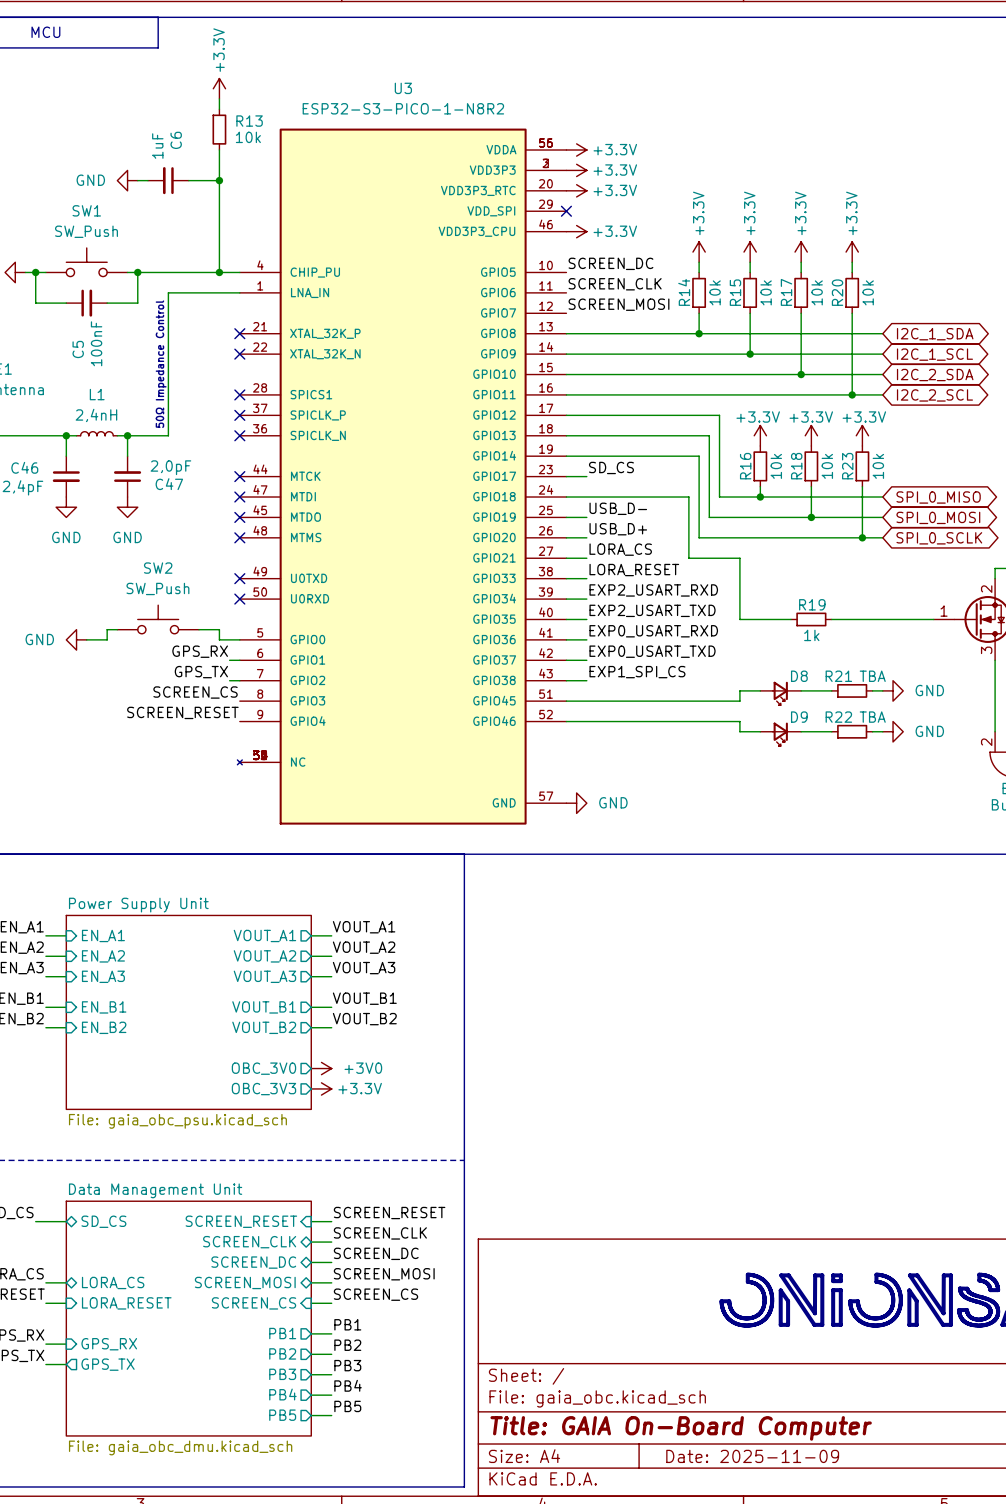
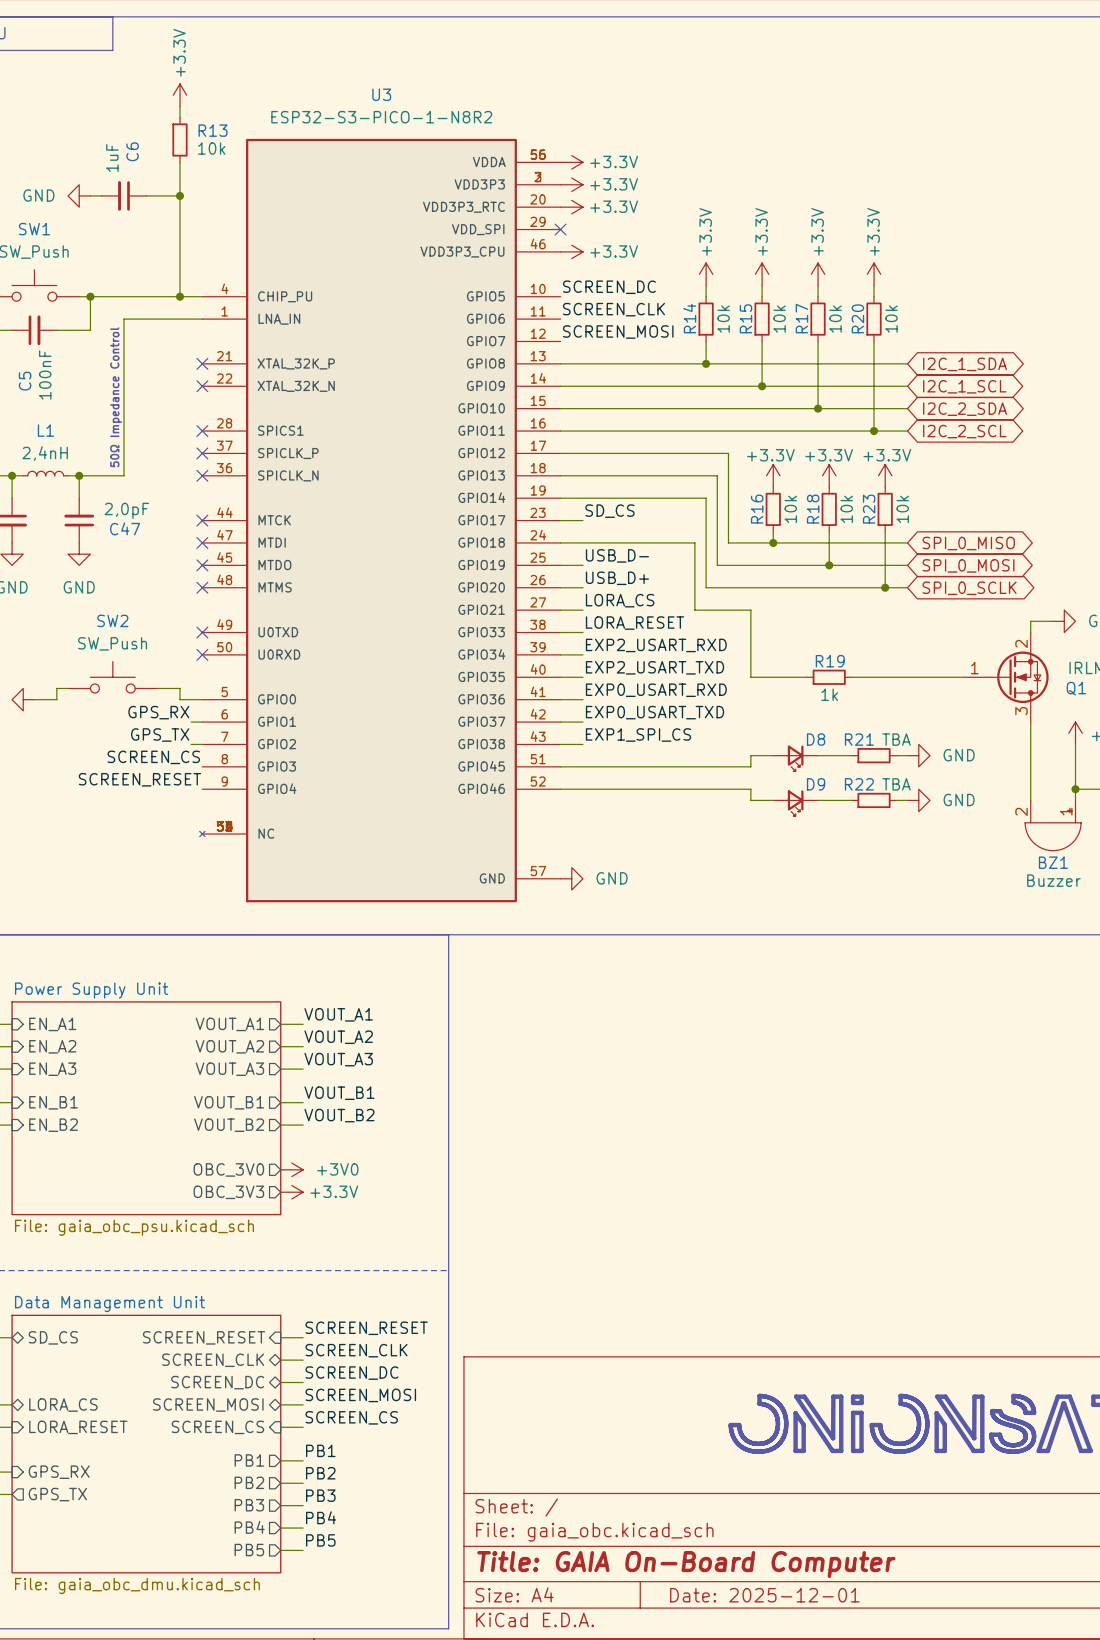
title block: Date: 2025-11-09 (752, 1456) -> Date: 2025-12-01 (764, 1595)

